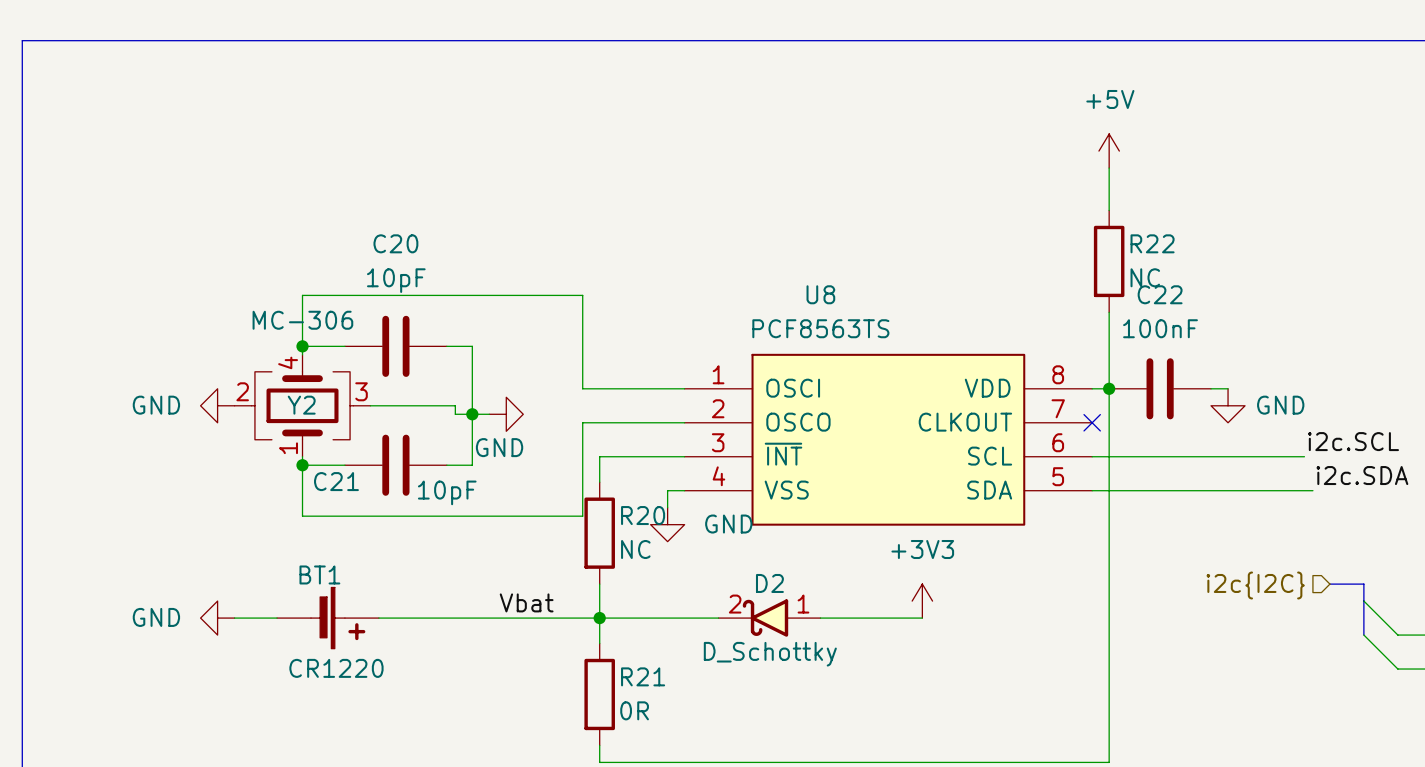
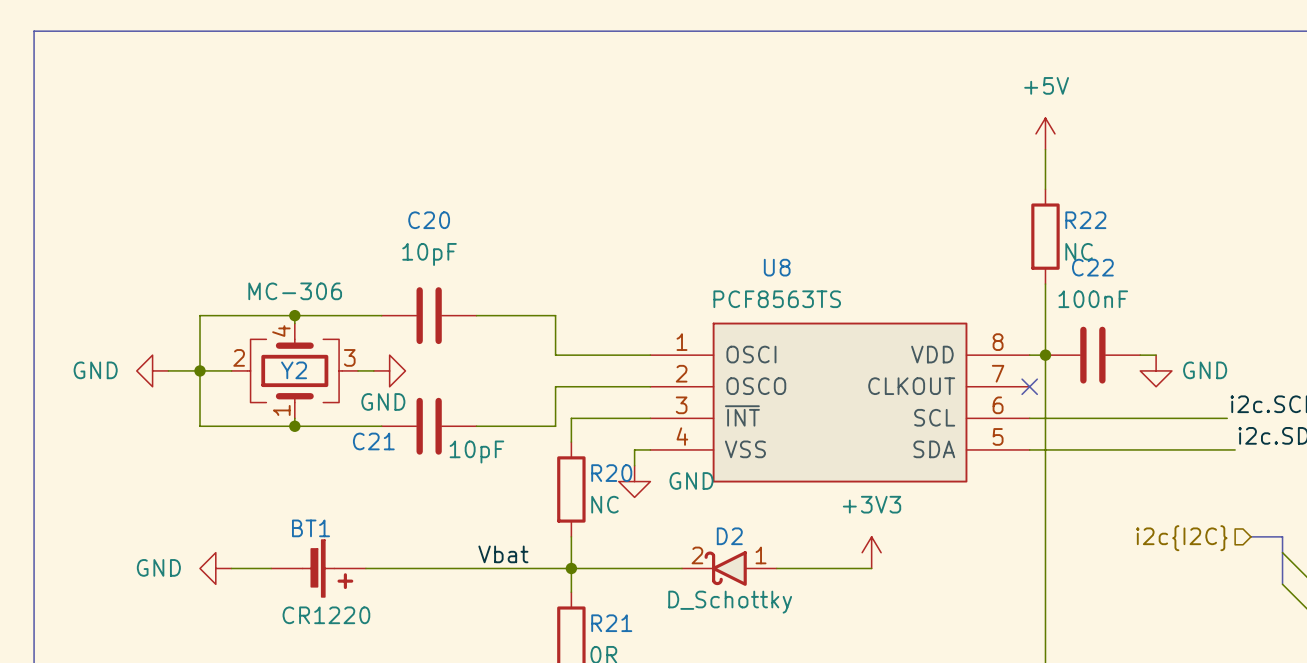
wire: (302, 346) (302, 295) (582, 295) (582, 346) -> (476, 315) (555, 315)
wire: none -> (294, 315) (200, 315) (200, 426) (294, 426)
C20 position: (395, 346) -> (429, 315)
wire: (446, 346) (472, 346) (472, 465) (446, 465) -> none
wire: none -> (168, 370) (231, 370)
junction: none -> (200, 370)
power symbol position: GND (217, 405) -> GND (152, 370)
wire: (387, 405) (455, 405) (455, 414) (489, 414) -> none
power symbol: none -> GND (389, 370)
junction: (472, 414) -> none
power symbol: GND (506, 414) -> none
wire: (302, 465) (302, 516) (582, 516) (582, 465) -> (476, 426) (555, 426)
C21 position: (395, 465) -> (429, 426)

